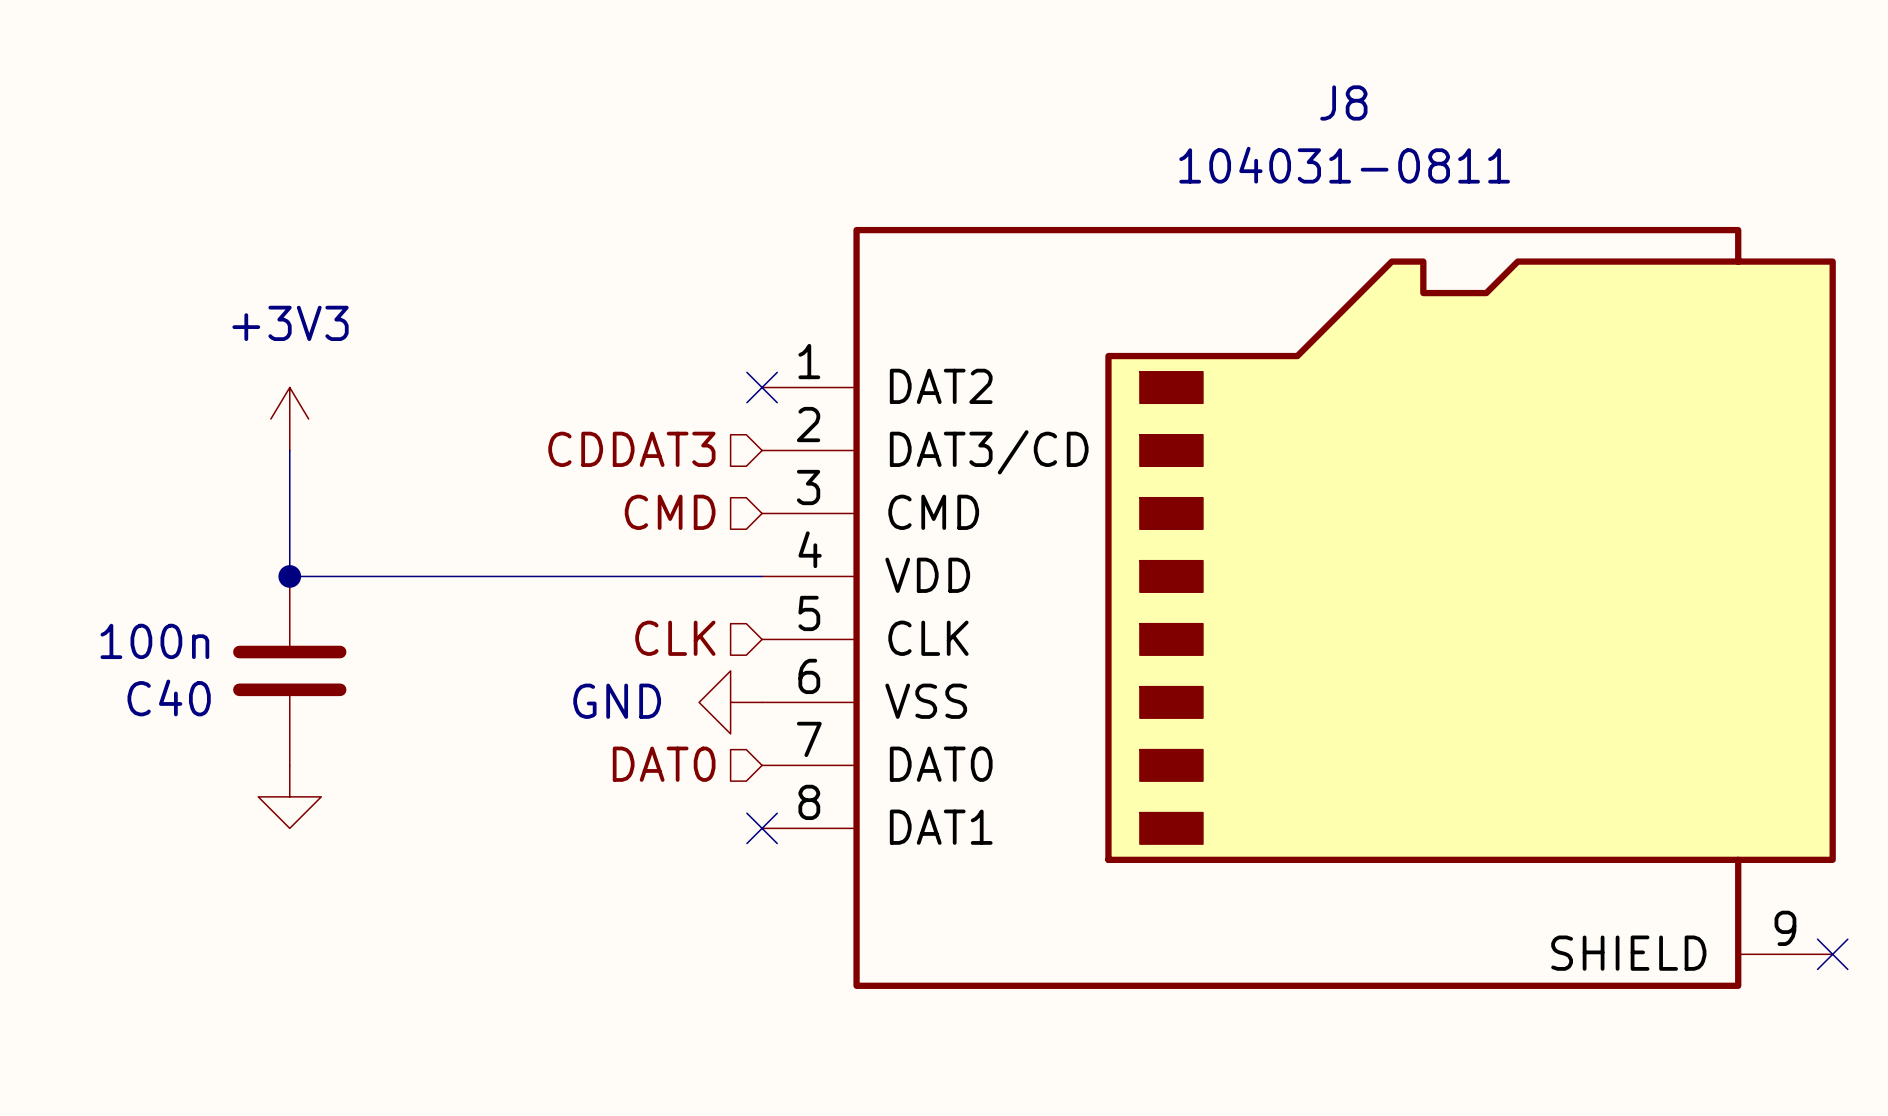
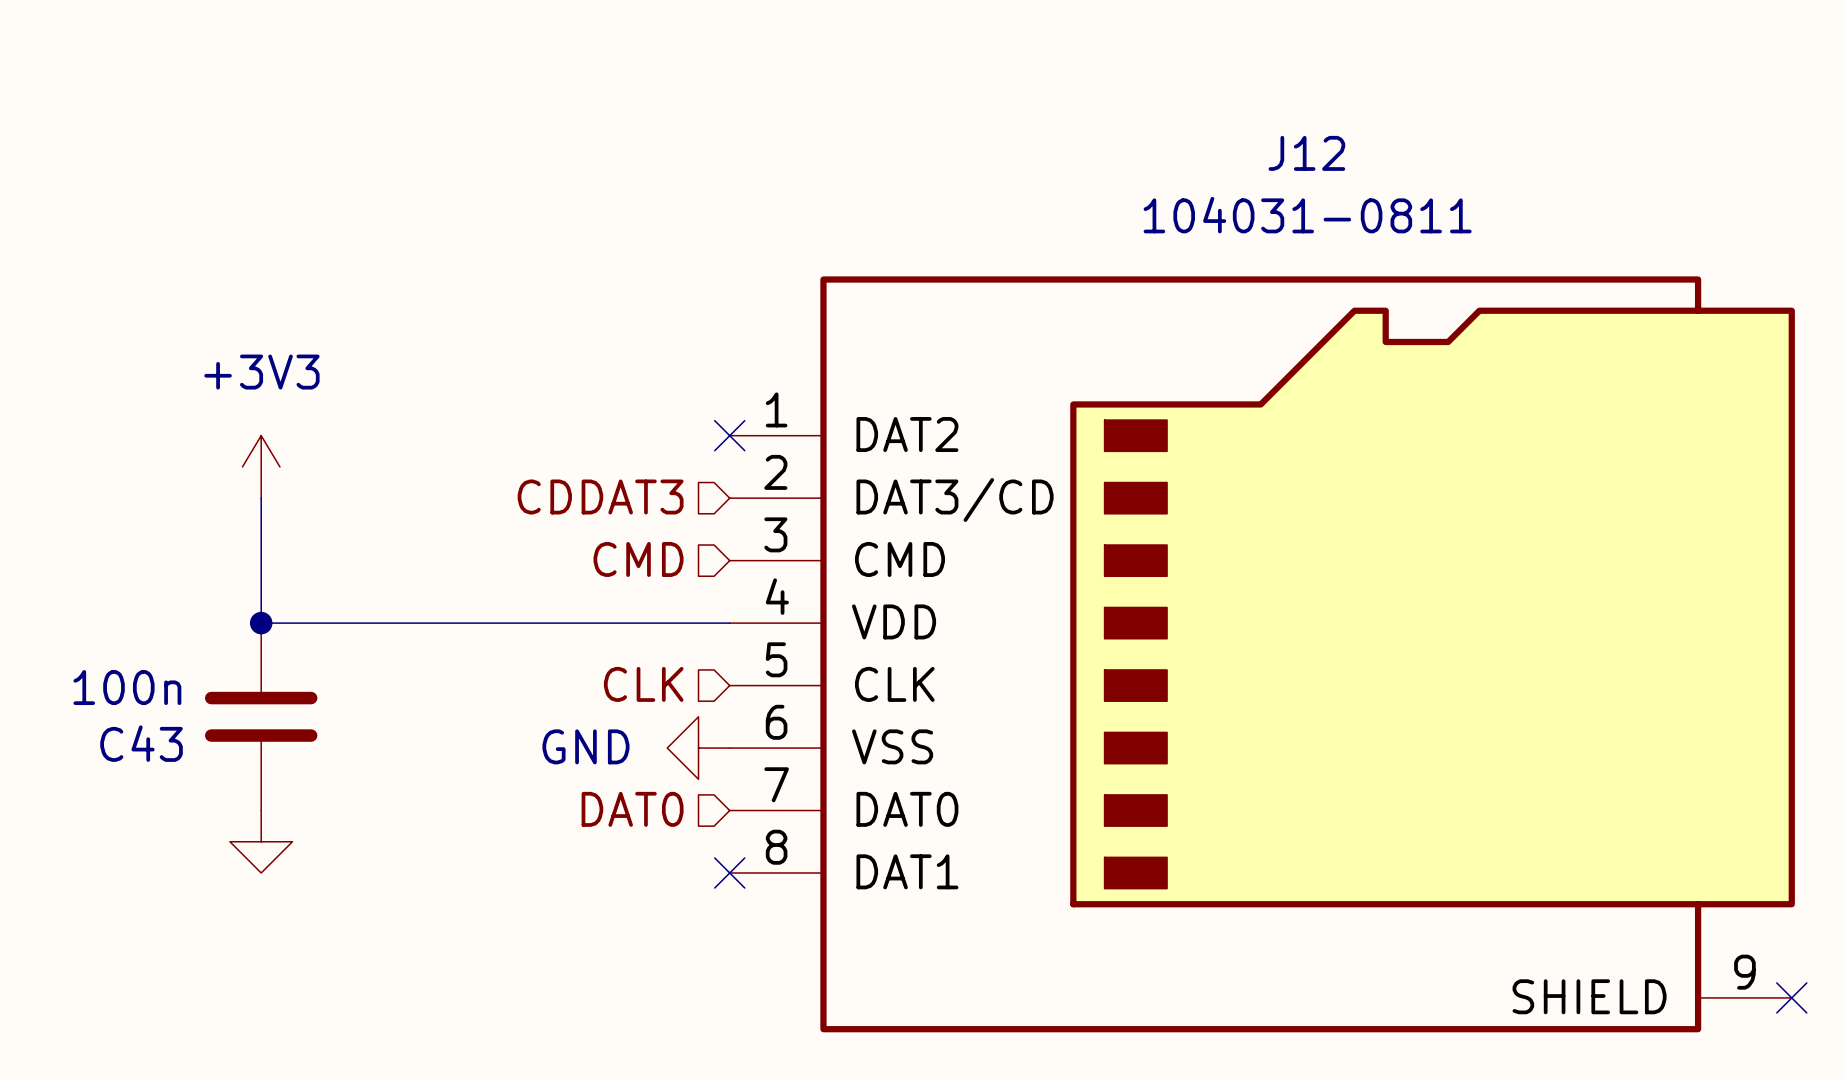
J8 name: J8 (1343, 102) -> J12 (1306, 153)
C40 name: C40 (169, 697) -> C43 (141, 743)

